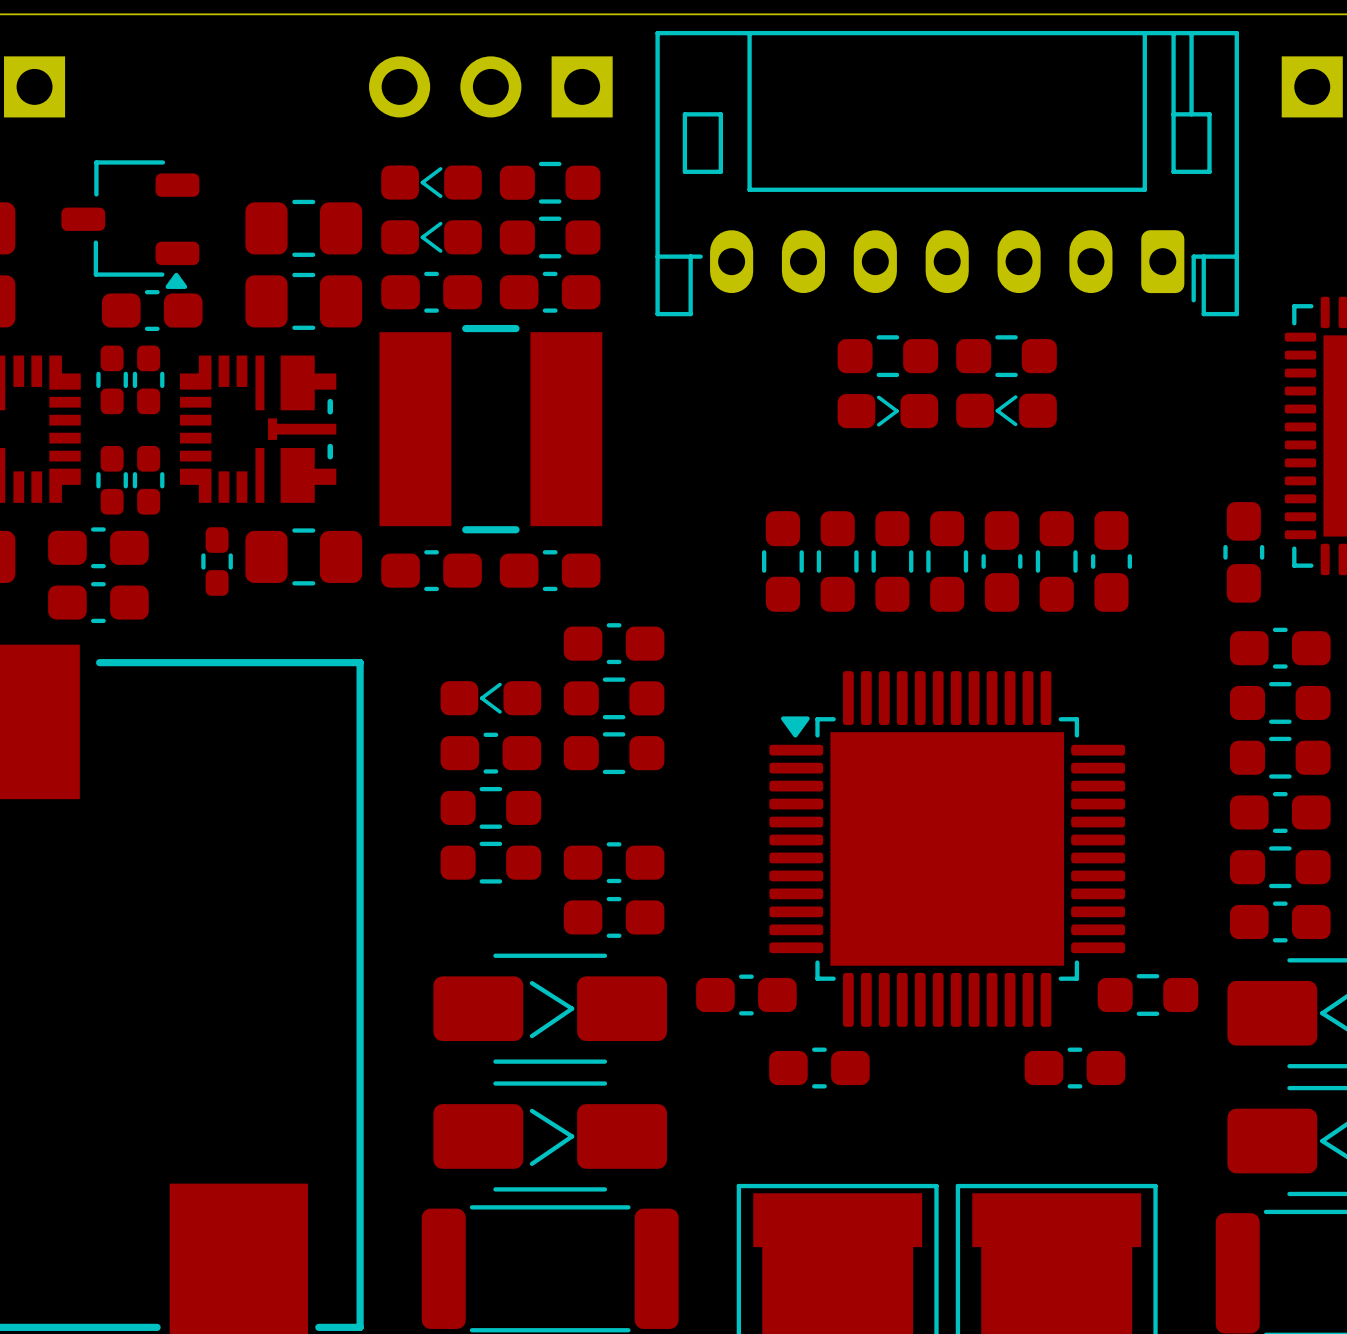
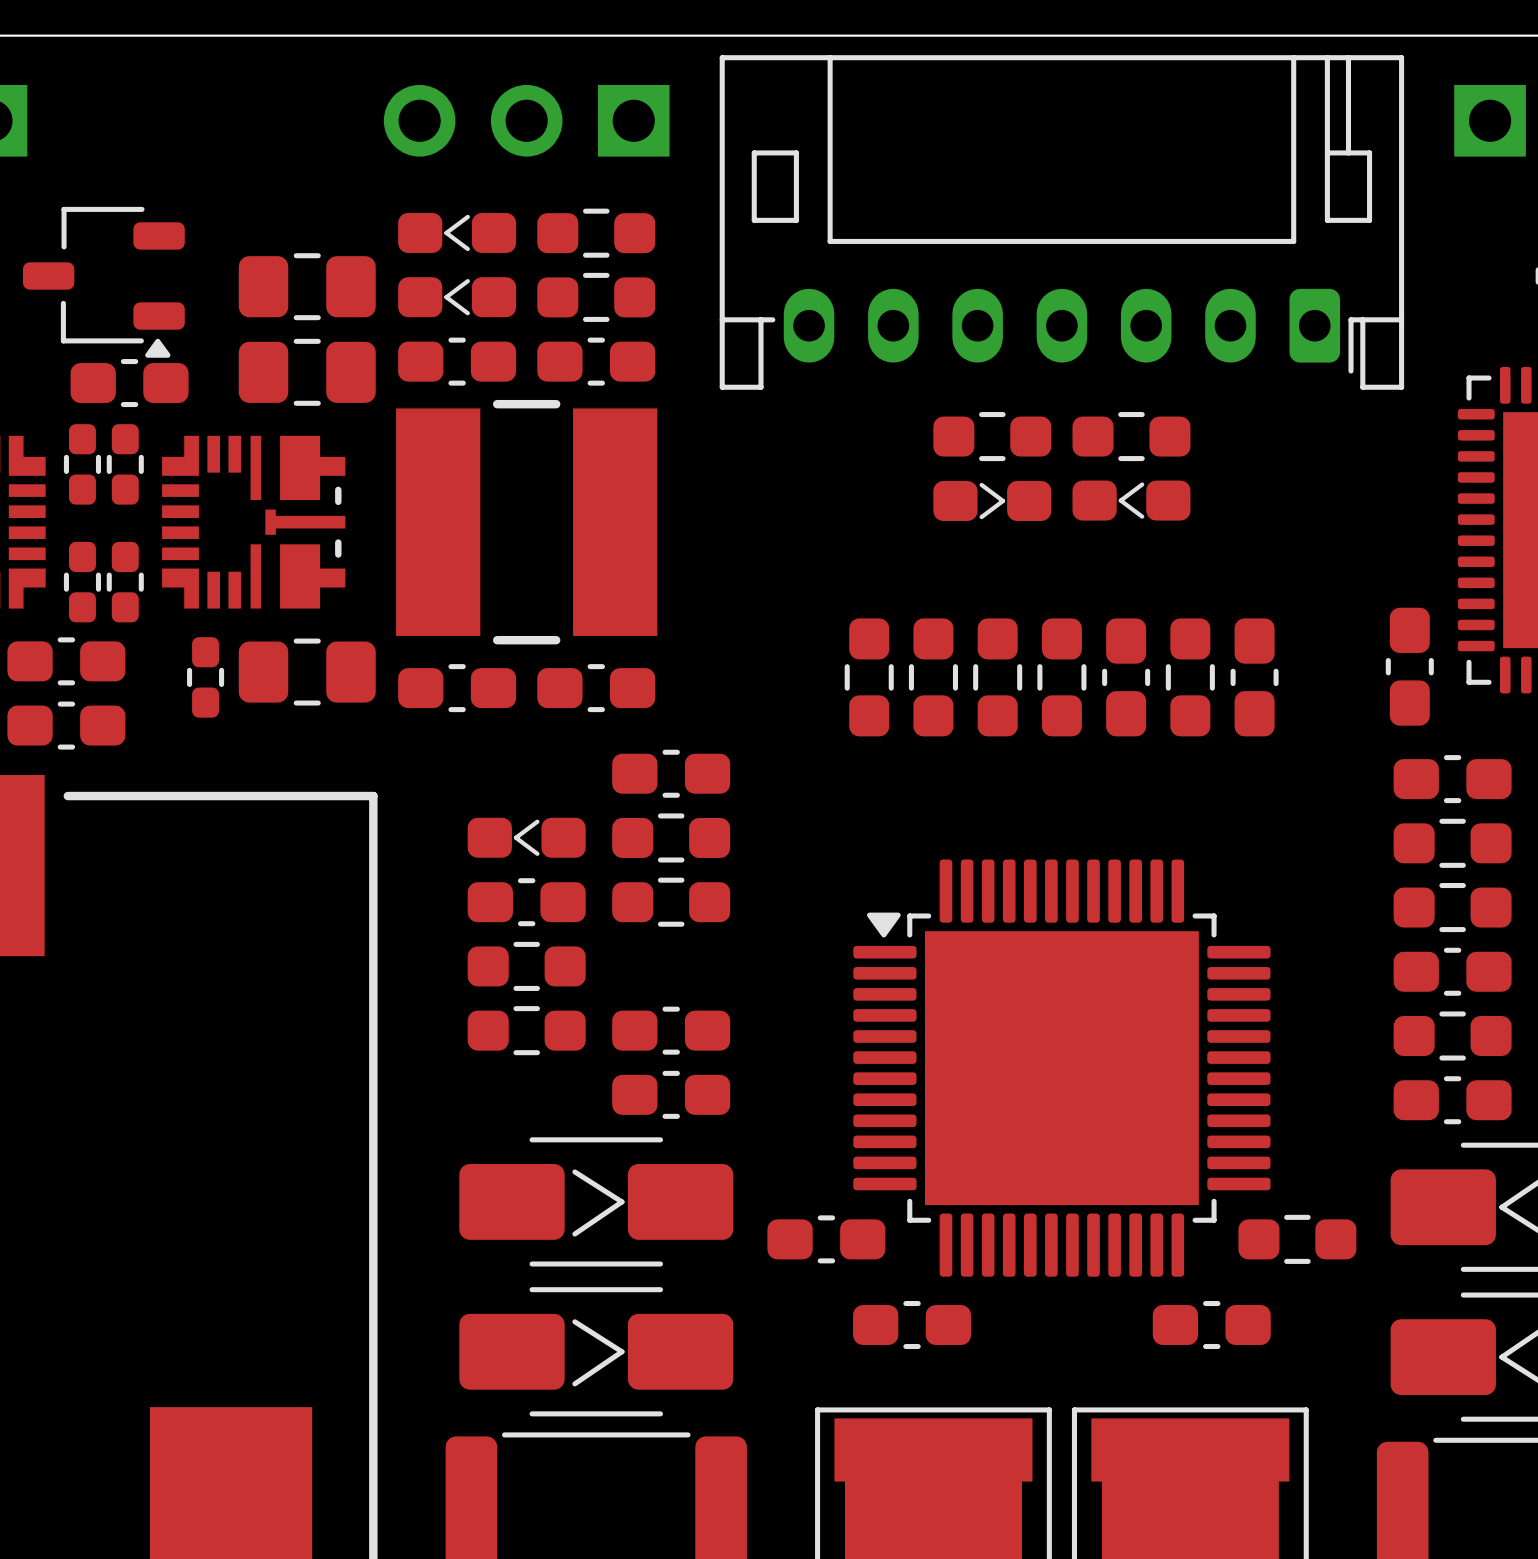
part position: (947, 848) -> (1061, 1068)
part: (746, 995) -> none
part position: (1147, 995) -> (1297, 1239)
part: none -> (826, 1239)
part: (819, 1068) -> none
part position: (1074, 1068) -> (1211, 1325)
part: none -> (912, 1325)

